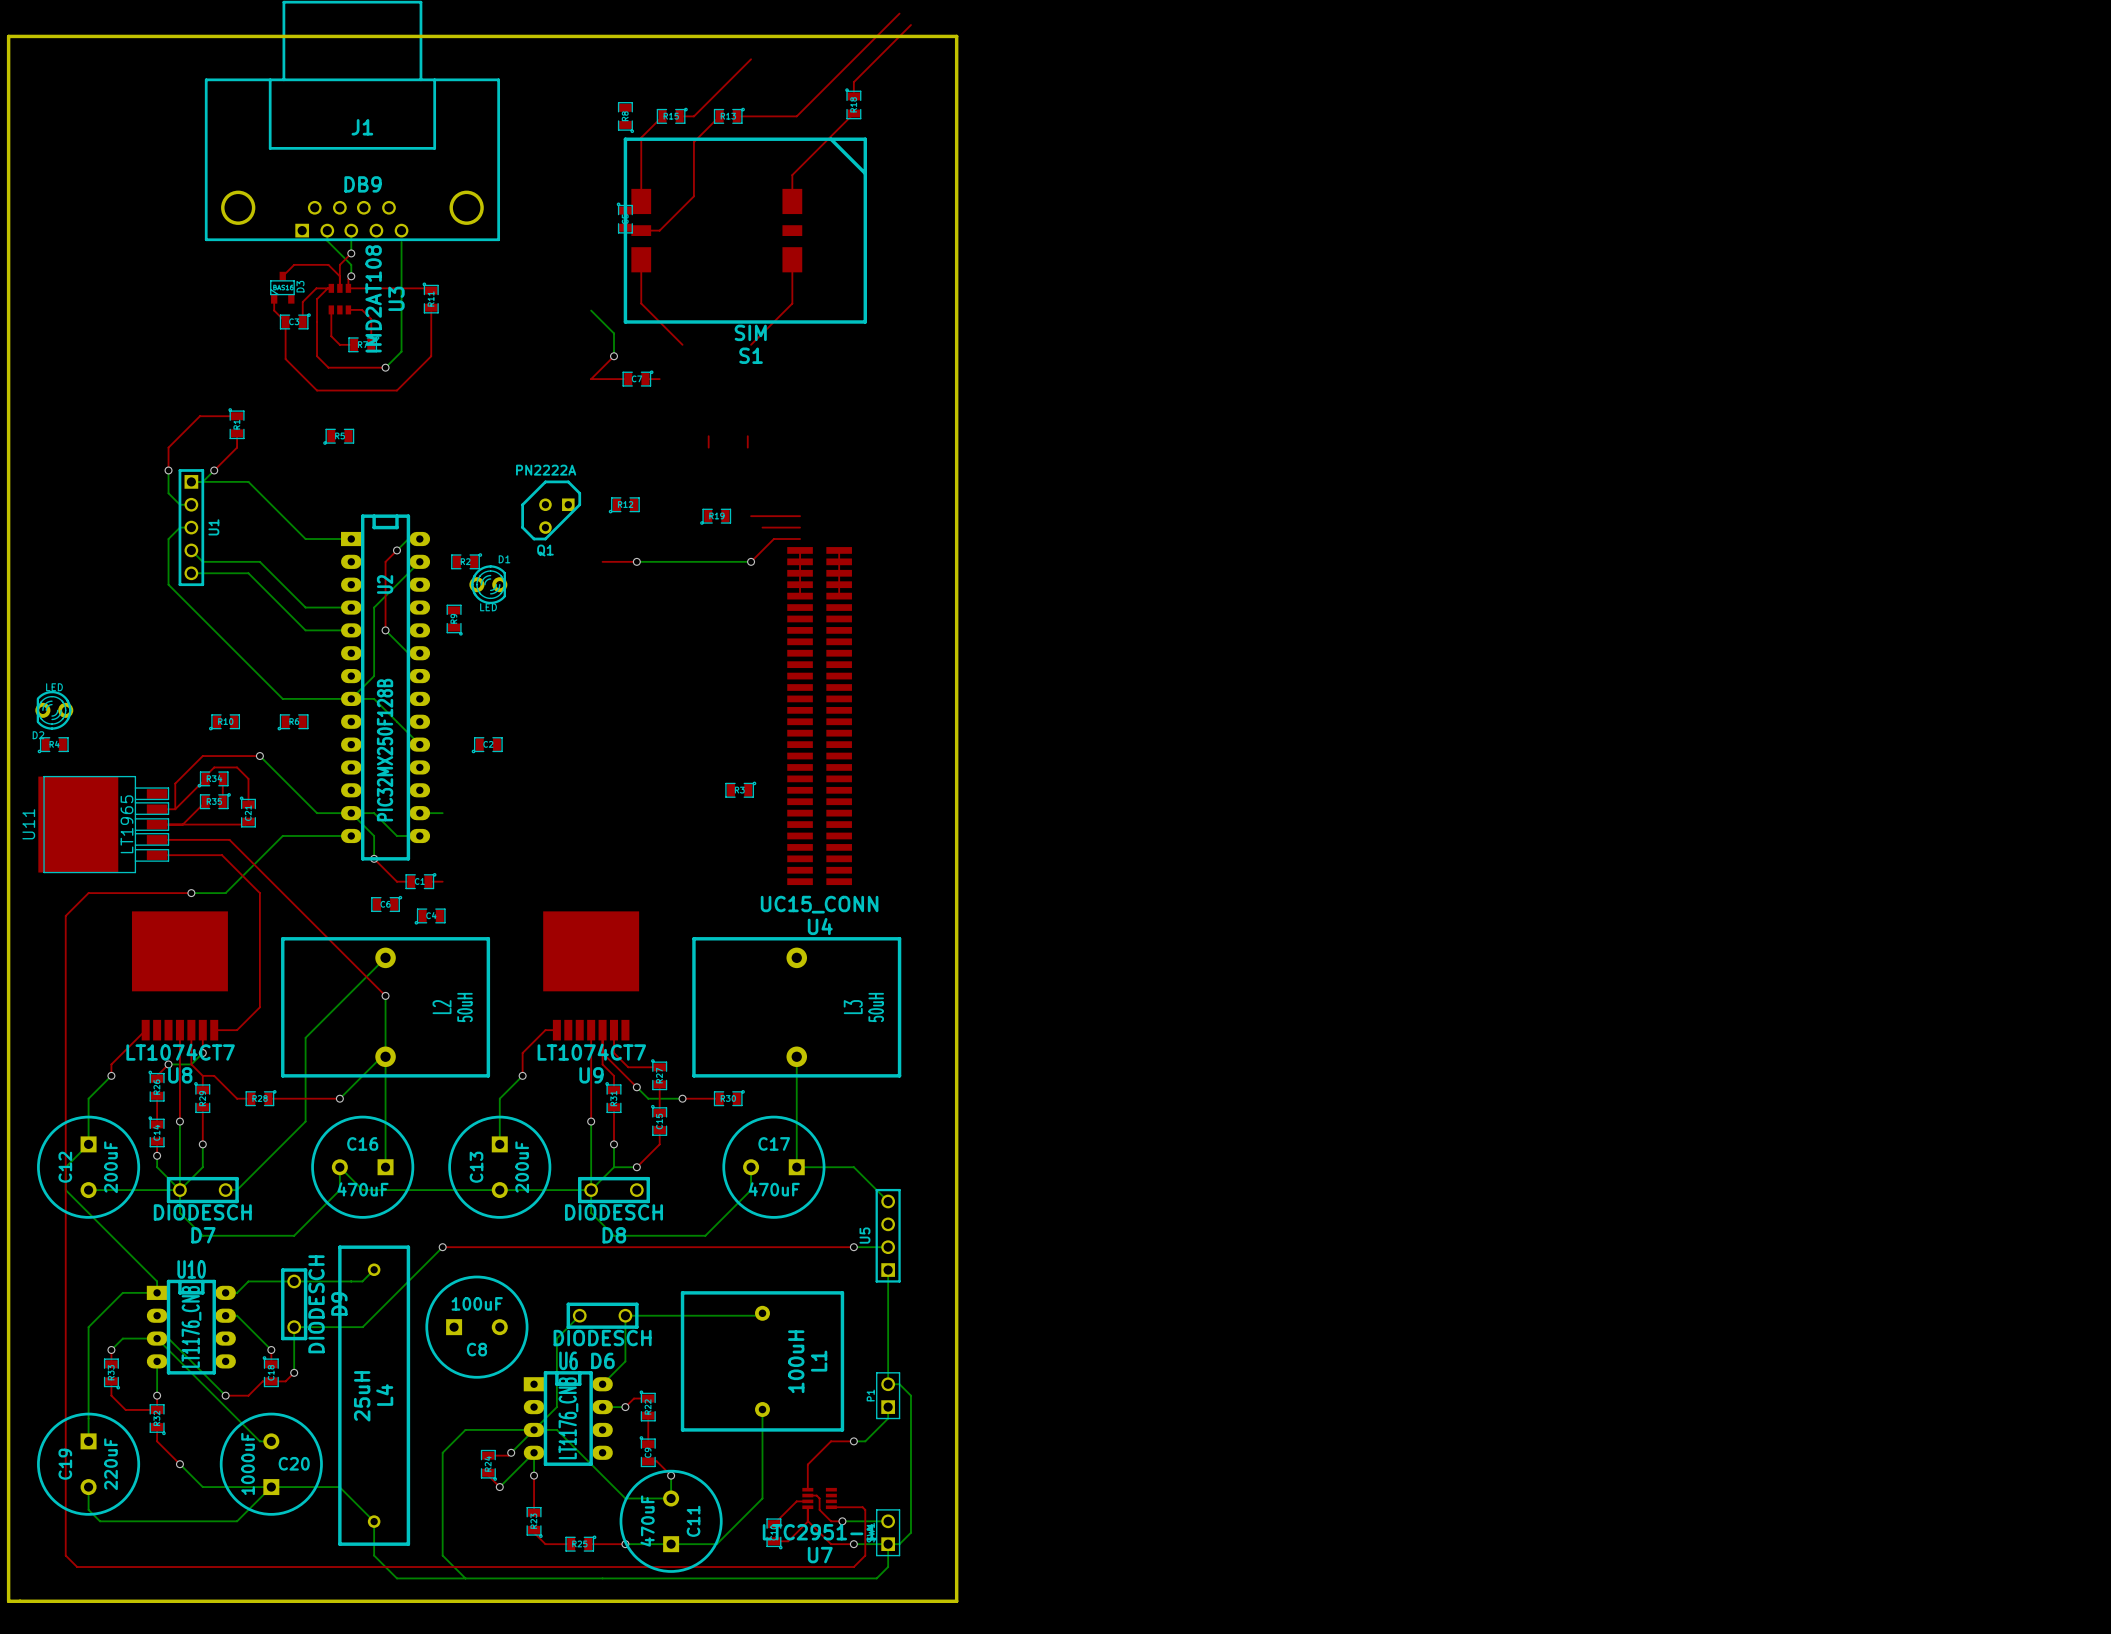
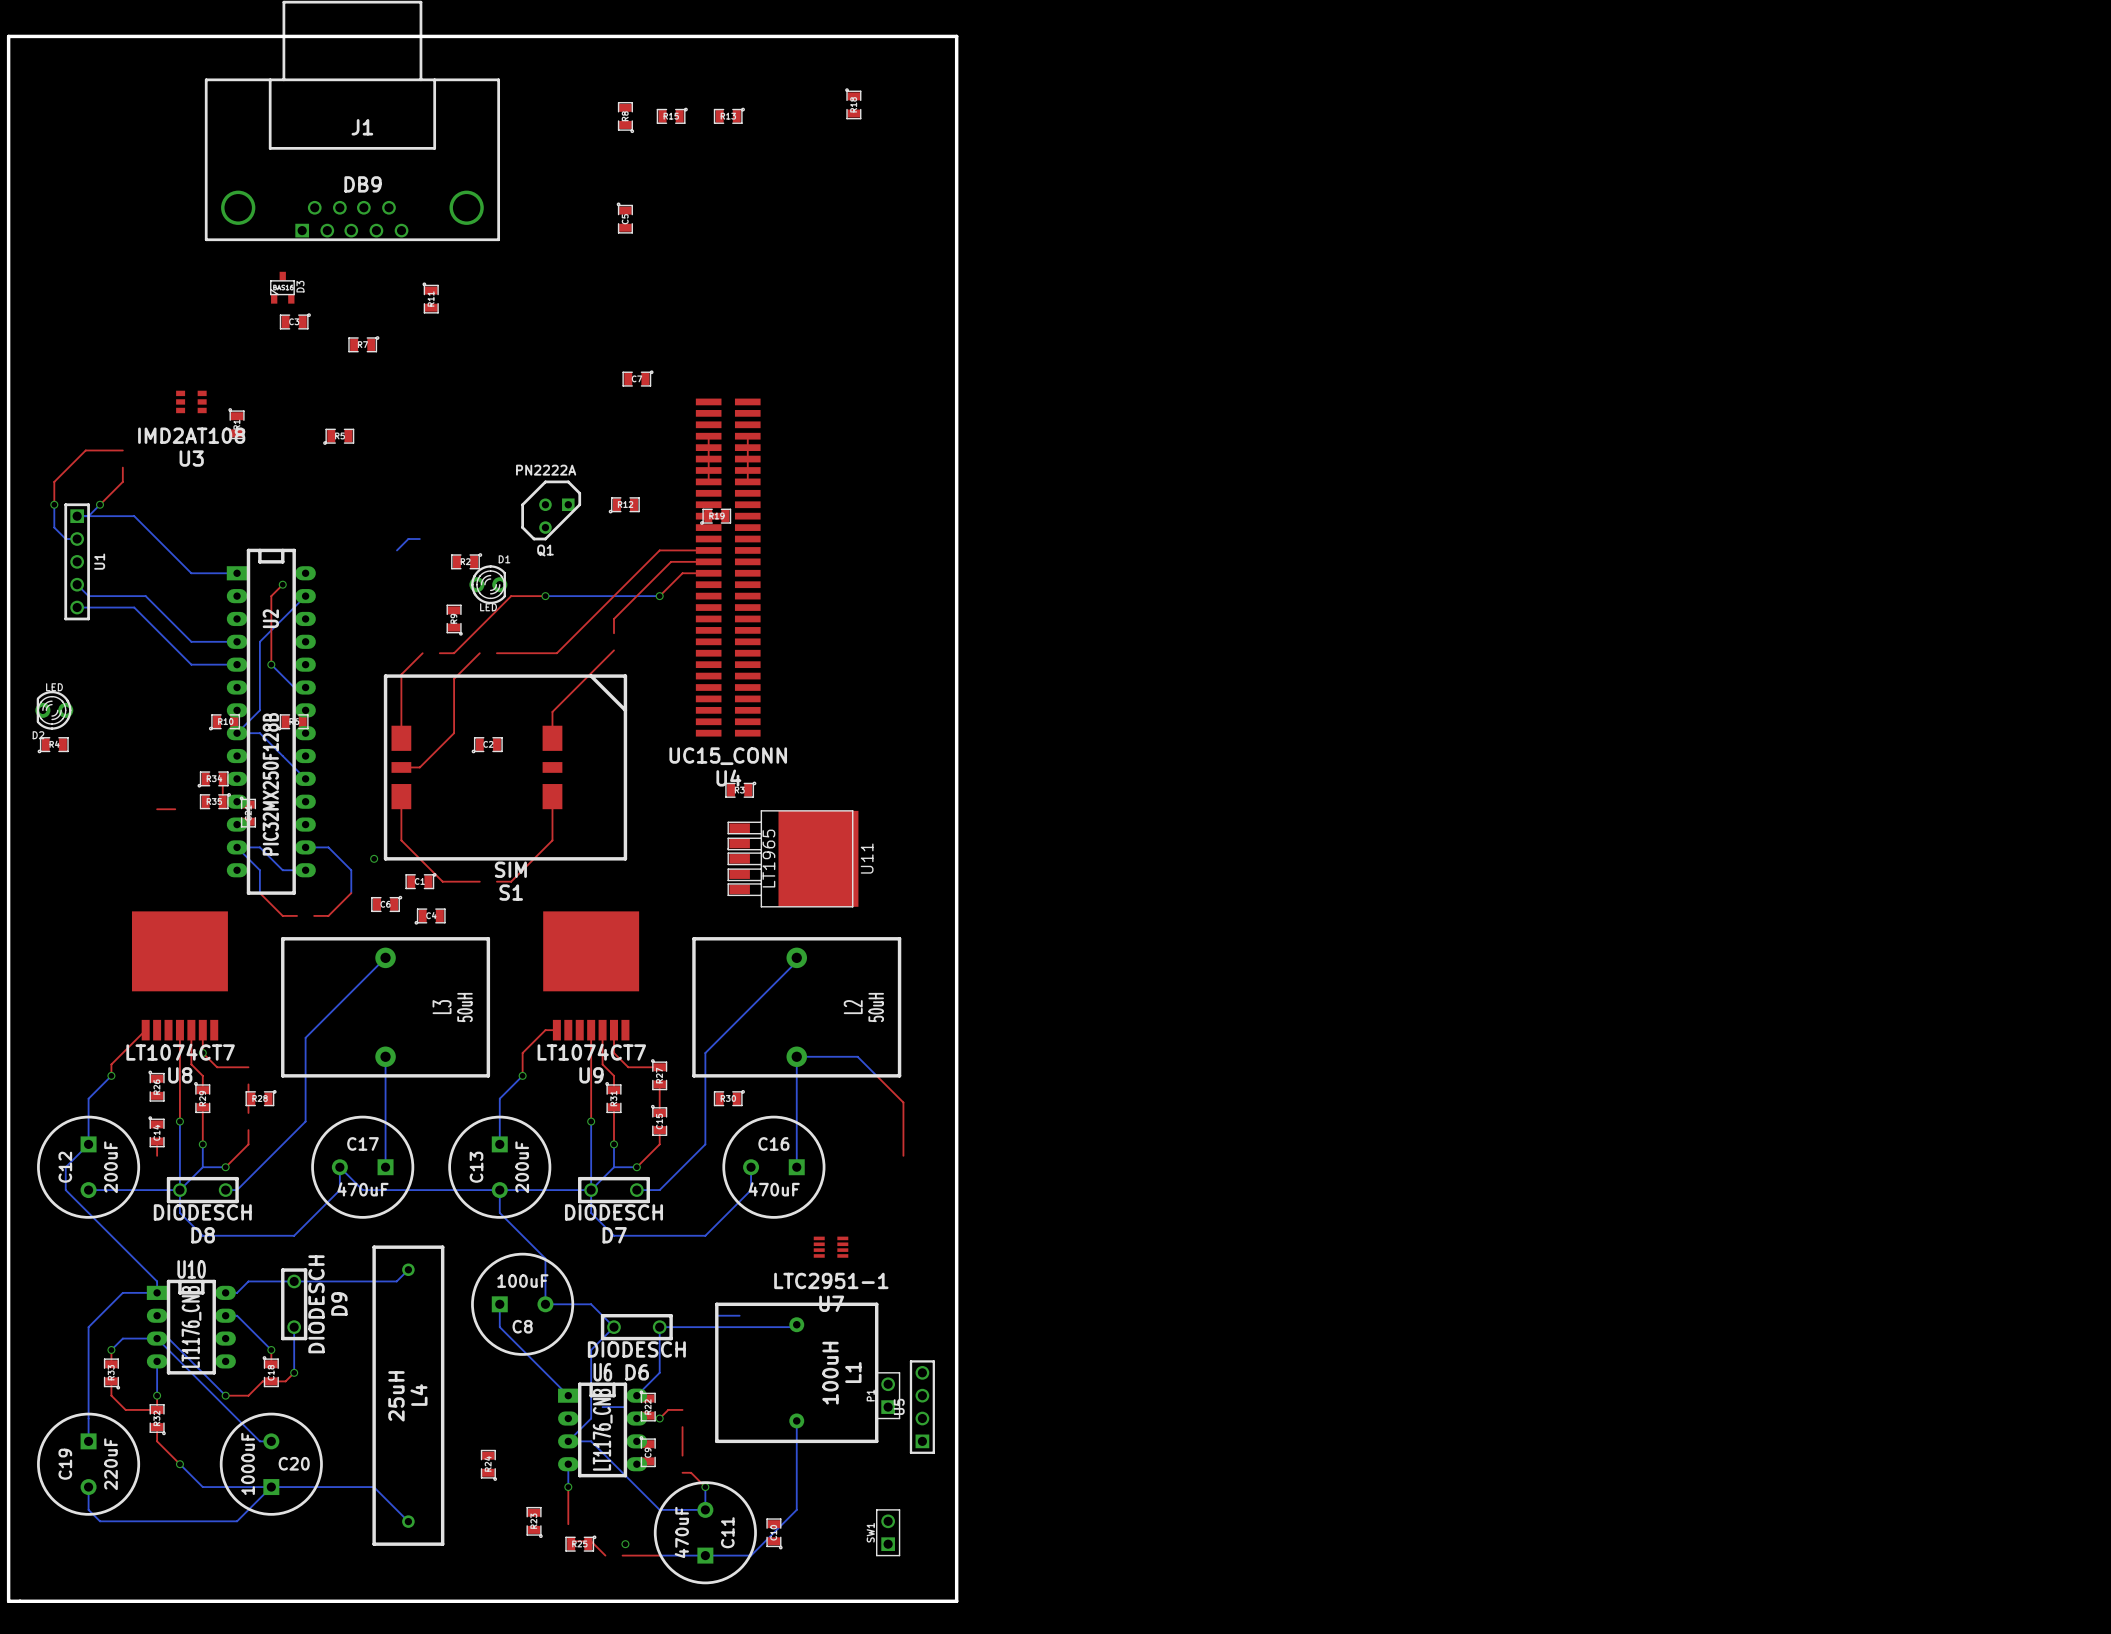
top track: (899, 13) (796, 116) (736, 116) -> none
top track: (910, 25) (853, 82) (853, 96) -> none
top track: (751, 59) (693, 116) (679, 116) -> none
top track: (853, 113) (792, 175) (792, 201) -> none
top track: (662, 116) (641, 137) (641, 201) -> none
top track: (719, 116) (693, 142) (693, 196) (659, 230) (641, 230) -> none
bottom track: (328, 230) (327, 240) (351, 264) (351, 276) -> none
bottom track: (351, 230) (351, 253) -> none
S1 position: (745, 230) -> (505, 767)
bottom track: (401, 242) (401, 351) (385, 367) -> none
top track: (351, 253) (339, 264) (339, 288) -> none
via: (351, 253) -> none
top track: (641, 259) (641, 303) (682, 344) -> none
top track: (792, 259) (792, 303) (751, 344) -> none
top track: (282, 276) (294, 264) (328, 264) (339, 276) -> none
top track: (351, 276) (348, 279) (348, 288) (429, 288) (431, 290) -> none
via: (351, 276) -> none
top track: (327, 288) (317, 299) (317, 356) (328, 367) (385, 367) -> none
top track: (331, 288) (316, 288) (302, 302) (302, 321) -> none
top track: (274, 299) (274, 310) (285, 321) (285, 359) (317, 390) (396, 390) (431, 356) (431, 307) -> none
U3 rotation: 0° (339, 299) -> 90° clockwise (191, 401)
U3 position: (339, 299) -> (191, 401)
top track: (331, 309) (331, 336) (339, 344) (354, 344) -> none
top track: (348, 309) (362, 309) (371, 319) (371, 344) -> none
bottom track: (591, 310) (614, 333) (614, 356) -> none
top track: (614, 356) (591, 379) (628, 379) -> none
via: (614, 356) -> none
via: (385, 367) -> none
top track: (645, 379) (659, 379) -> none
top track: (237, 416) (199, 416) (168, 447) (168, 470) -> (122, 450) (85, 450) (54, 481) (54, 504)
top track: (237, 433) (237, 447) (214, 470) -> (122, 467) (122, 481) (100, 504)
top track: none -> (708, 447) (708, 481)
top track: none -> (747, 447) (747, 481)
bottom track: (168, 470) (168, 493) (179, 504) (191, 504) -> (54, 504) (54, 527) (65, 539) (77, 539)
via: (168, 470) -> none
bottom track: (214, 470) (202, 481) -> (100, 504) (88, 516)
via: (214, 470) -> none
bottom track: (191, 481) (248, 481) (305, 539) (351, 539) -> (77, 607) (134, 607) (191, 664) (237, 664)
via: none -> (54, 504)
via: none -> (100, 504)
bottom track: none -> (77, 516) (134, 516) (191, 573)
top track: (751, 516) (800, 516) -> none
bottom track: (191, 527) (179, 527) (168, 539) (168, 584) (282, 698) (374, 698) (419, 744) -> none
U1 position: (191, 527) -> (77, 561)
top track: (762, 527) (800, 527) -> none
top track: (800, 539) (773, 539) (751, 561) -> (708, 573) (682, 573) (659, 596)
bottom track: (191, 550) (202, 561) (259, 561) (305, 607) (351, 607) -> (77, 584) (88, 596) (145, 596) (191, 641) (237, 641)
top track: (396, 550) (385, 561) (385, 630) -> (282, 584) (271, 596) (271, 664)
via: (396, 550) -> none
top track: none -> (708, 550) (659, 550) (556, 653) (496, 653)
top track: (800, 550) (800, 596) -> none
top track: (839, 550) (839, 596) -> none
bottom track: (419, 561) (374, 607) (374, 676) (351, 698) -> none
top track: (602, 561) (636, 561) -> none
bottom track: (636, 561) (751, 561) -> (545, 596) (659, 596)
via position: (636, 561) -> (659, 596)
top track: none -> (708, 561) (671, 561) (614, 618) (614, 633)
via: (751, 561) -> none
bottom track: (237, 573) (248, 573) (305, 630) (351, 630) -> none
via: none -> (282, 584)
bottom track: none -> (305, 596) (259, 641) (259, 710) (237, 733) (259, 733) (305, 778)
top track: none -> (545, 596) (511, 596) (454, 653) (439, 653)
via: none -> (545, 596)
bottom track: (385, 630) (408, 653) (419, 653) -> (271, 664) (294, 687) (305, 687)
via: (385, 630) -> none
top track: none -> (614, 650) (552, 711) (552, 738)
top track: none -> (422, 653) (401, 674) (401, 738)
top track: none -> (479, 653) (454, 678) (454, 733) (419, 767) (401, 767)
via: none -> (271, 664)
U2 position: (385, 687) -> (271, 721)
U4 position: (819, 716) -> (728, 567)
top track: (259, 756) (202, 756) (175, 783) (175, 809) (205, 778) (205, 776) (214, 767) (237, 767) (248, 778) (248, 804) -> none
bottom track: (259, 756) (317, 813) (374, 813) (396, 835) (419, 835) -> none
via: (259, 756) -> none
top track: none -> (401, 796) (401, 840) (442, 881) (479, 881)
top track: none -> (552, 796) (552, 840) (511, 881) (496, 881)
top track: (205, 801) (182, 824) -> none
bottom track: (351, 813) (374, 835) (374, 858) -> none
bottom track: (419, 813) (442, 813) -> none
top track: (248, 821) (245, 824) (157, 824) -> none
U11 rotation: 0° (103, 824) -> 180° (793, 858)
U11 position: (103, 824) -> (793, 858)
bottom track: (351, 835) (282, 835) (225, 893) (191, 893) -> none
top track: (157, 839) (229, 839) (385, 995) -> none
bottom track: none -> (305, 847) (328, 847) (351, 870) (351, 893)
top track: (157, 855) (221, 855) (259, 893) (259, 1007) (237, 1030) (214, 1030) -> none
top track: (374, 858) (396, 881) (411, 881) -> (259, 893) (282, 915) (297, 915)
bottom track: none -> (305, 870) (282, 870) (259, 847) (237, 847) (259, 870) (259, 893)
top track: (428, 881) (442, 881) -> none
top track: (191, 893) (88, 893) (65, 915) (65, 1555) (77, 1567) (853, 1567) (865, 1555) (865, 1509) (862, 1507) (831, 1507) -> none
via: (191, 893) -> none
top track: none -> (351, 893) (328, 915) (314, 915)
bottom track: none -> (796, 957) (796, 961) (705, 1053) (705, 1144) (659, 1190) (636, 1190)
bottom track: (385, 995) (385, 1056) (381, 1056) (339, 1098) -> none
via: (385, 995) -> none
L2 name: L2 (442, 1007) -> L3 (442, 1007)
L3 name: L3 (853, 1007) -> L2 (853, 1007)
top track: none -> (202, 1053) (217, 1067) (248, 1067)
bottom track: (202, 1053) (191, 1064) (168, 1064) -> none
top track: (602, 1053) (636, 1087) -> none
bottom track: none -> (796, 1056) (857, 1056) (876, 1075)
top track: (168, 1064) (157, 1075) (157, 1078) -> none
via: (168, 1064) -> none
top track: (202, 1075) (214, 1075) (237, 1098) (251, 1098) -> none
top track: none -> (876, 1075) (903, 1102) (903, 1155)
bottom track: (636, 1087) (648, 1098) (682, 1098) -> none
via: (636, 1087) -> none
top track: (157, 1095) (157, 1124) -> (248, 1084) (248, 1112)
top track: (268, 1098) (339, 1098) -> none
via: (339, 1098) -> none
top track: (682, 1098) (719, 1098) -> none
via: (682, 1098) -> none
top track: none -> (248, 1130) (248, 1144) (225, 1167)
C16 name: C16 (362, 1143) -> C17 (362, 1143)
C17 name: C17 (774, 1143) -> C16 (773, 1143)
bottom track: (157, 1155) (157, 1167) (179, 1190) -> none
via: (157, 1155) -> none
bottom track: none -> (202, 1167) (225, 1167)
via: none -> (225, 1167)
bottom track: (796, 1167) (853, 1167) (888, 1201) -> none
bottom track: none -> (499, 1190) (499, 1212) (545, 1258) (545, 1304) (591, 1304) (614, 1327) (591, 1349) (591, 1418) (568, 1441) (591, 1441) (659, 1509) (705, 1509) (705, 1487)
D7 name: D7 (203, 1235) -> D8 (203, 1235)
D8 name: D8 (614, 1235) -> D7 (614, 1235)
U5 position: (888, 1235) -> (922, 1407)
top track: (442, 1247) (853, 1247) -> none
bottom track: (442, 1247) (362, 1327) (294, 1327) -> none
via: (442, 1247) -> none
bottom track: (853, 1247) (888, 1247) -> none
via: (853, 1247) -> none
bottom track: (374, 1269) (362, 1281) -> (408, 1269) (396, 1281) (362, 1281)
bottom track: (888, 1270) (888, 1384) (899, 1384) (910, 1395) (910, 1532) (899, 1544) (853, 1544) -> none
bottom track: none -> (499, 1304) (499, 1327) (568, 1395)
bottom track: (762, 1313) (760, 1315) (739, 1315) -> none
bottom track: (579, 1315) (556, 1338) (556, 1407) (511, 1452) -> none
D6 position: (602, 1315) -> (636, 1327)
bottom track: (716, 1315) (625, 1315) (625, 1361) (602, 1384) -> none
bottom track: none -> (796, 1324) (794, 1327) (659, 1327) (659, 1372) (636, 1395)
C8 position: (476, 1327) -> (522, 1304)
L1 position: (762, 1361) -> (796, 1372)
L4 position: (374, 1395) -> (408, 1395)
top track: (648, 1398) (633, 1398) (625, 1407) -> (682, 1409) (668, 1409) (659, 1418)
via: (625, 1407) -> none
bottom track: (888, 1407) (888, 1418) (865, 1441) (853, 1441) -> none
bottom track: (762, 1409) (762, 1498) (716, 1544) (625, 1544) -> (796, 1420) (796, 1509) (751, 1555) (659, 1555)
top track: (648, 1415) (648, 1444) -> (682, 1427) (682, 1455)
U6 position: (568, 1418) -> (602, 1429)
via: none -> (659, 1418)
top track: (853, 1441) (831, 1441) (807, 1464) (807, 1489) -> none
via: (853, 1441) -> none
top track: (511, 1452) (508, 1455) (488, 1455) -> none
via: (511, 1452) -> none
top track: (648, 1461) (656, 1461) (671, 1475) -> (682, 1472) (691, 1472) (705, 1487)
bottom track: none -> (568, 1464) (568, 1487)
top track: (488, 1472) (488, 1475) (499, 1487) -> none
top track: (534, 1475) (534, 1512) -> (568, 1487) (568, 1524)
bottom track: (534, 1475) (534, 1452) (499, 1487) -> none
via: (534, 1475) -> none
bottom track: (671, 1475) (671, 1498) (625, 1498) (556, 1429) (465, 1429) (442, 1452) (442, 1555) (465, 1578) -> none
via: (671, 1475) -> none
bottom track: (339, 1487) (374, 1521) (374, 1555) (396, 1578) (876, 1578) (888, 1567) (888, 1544) -> (339, 1487) (373, 1487) (408, 1521)
via: (499, 1487) -> none
via: none -> (568, 1487)
via: none -> (705, 1487)
top track: (807, 1495) (816, 1495) (819, 1498) (819, 1509) (831, 1521) (842, 1521) -> none
U7 position: (819, 1498) -> (831, 1247)
top track: (807, 1501) (796, 1501) (773, 1524) -> none
top track: (807, 1507) (807, 1521) (788, 1541) (773, 1541) -> none
top track: (807, 1520) (831, 1544) (853, 1544) -> none
C11 position: (671, 1521) -> (705, 1532)
bottom track: (842, 1521) (888, 1521) -> none
via: (842, 1521) -> none
top track: (534, 1529) (534, 1532) (545, 1544) (571, 1544) -> none
top track: none -> (568, 1541) (591, 1541) (605, 1555)
top track: (588, 1544) (625, 1544) -> (622, 1555) (659, 1555)
via: (853, 1544) -> none

